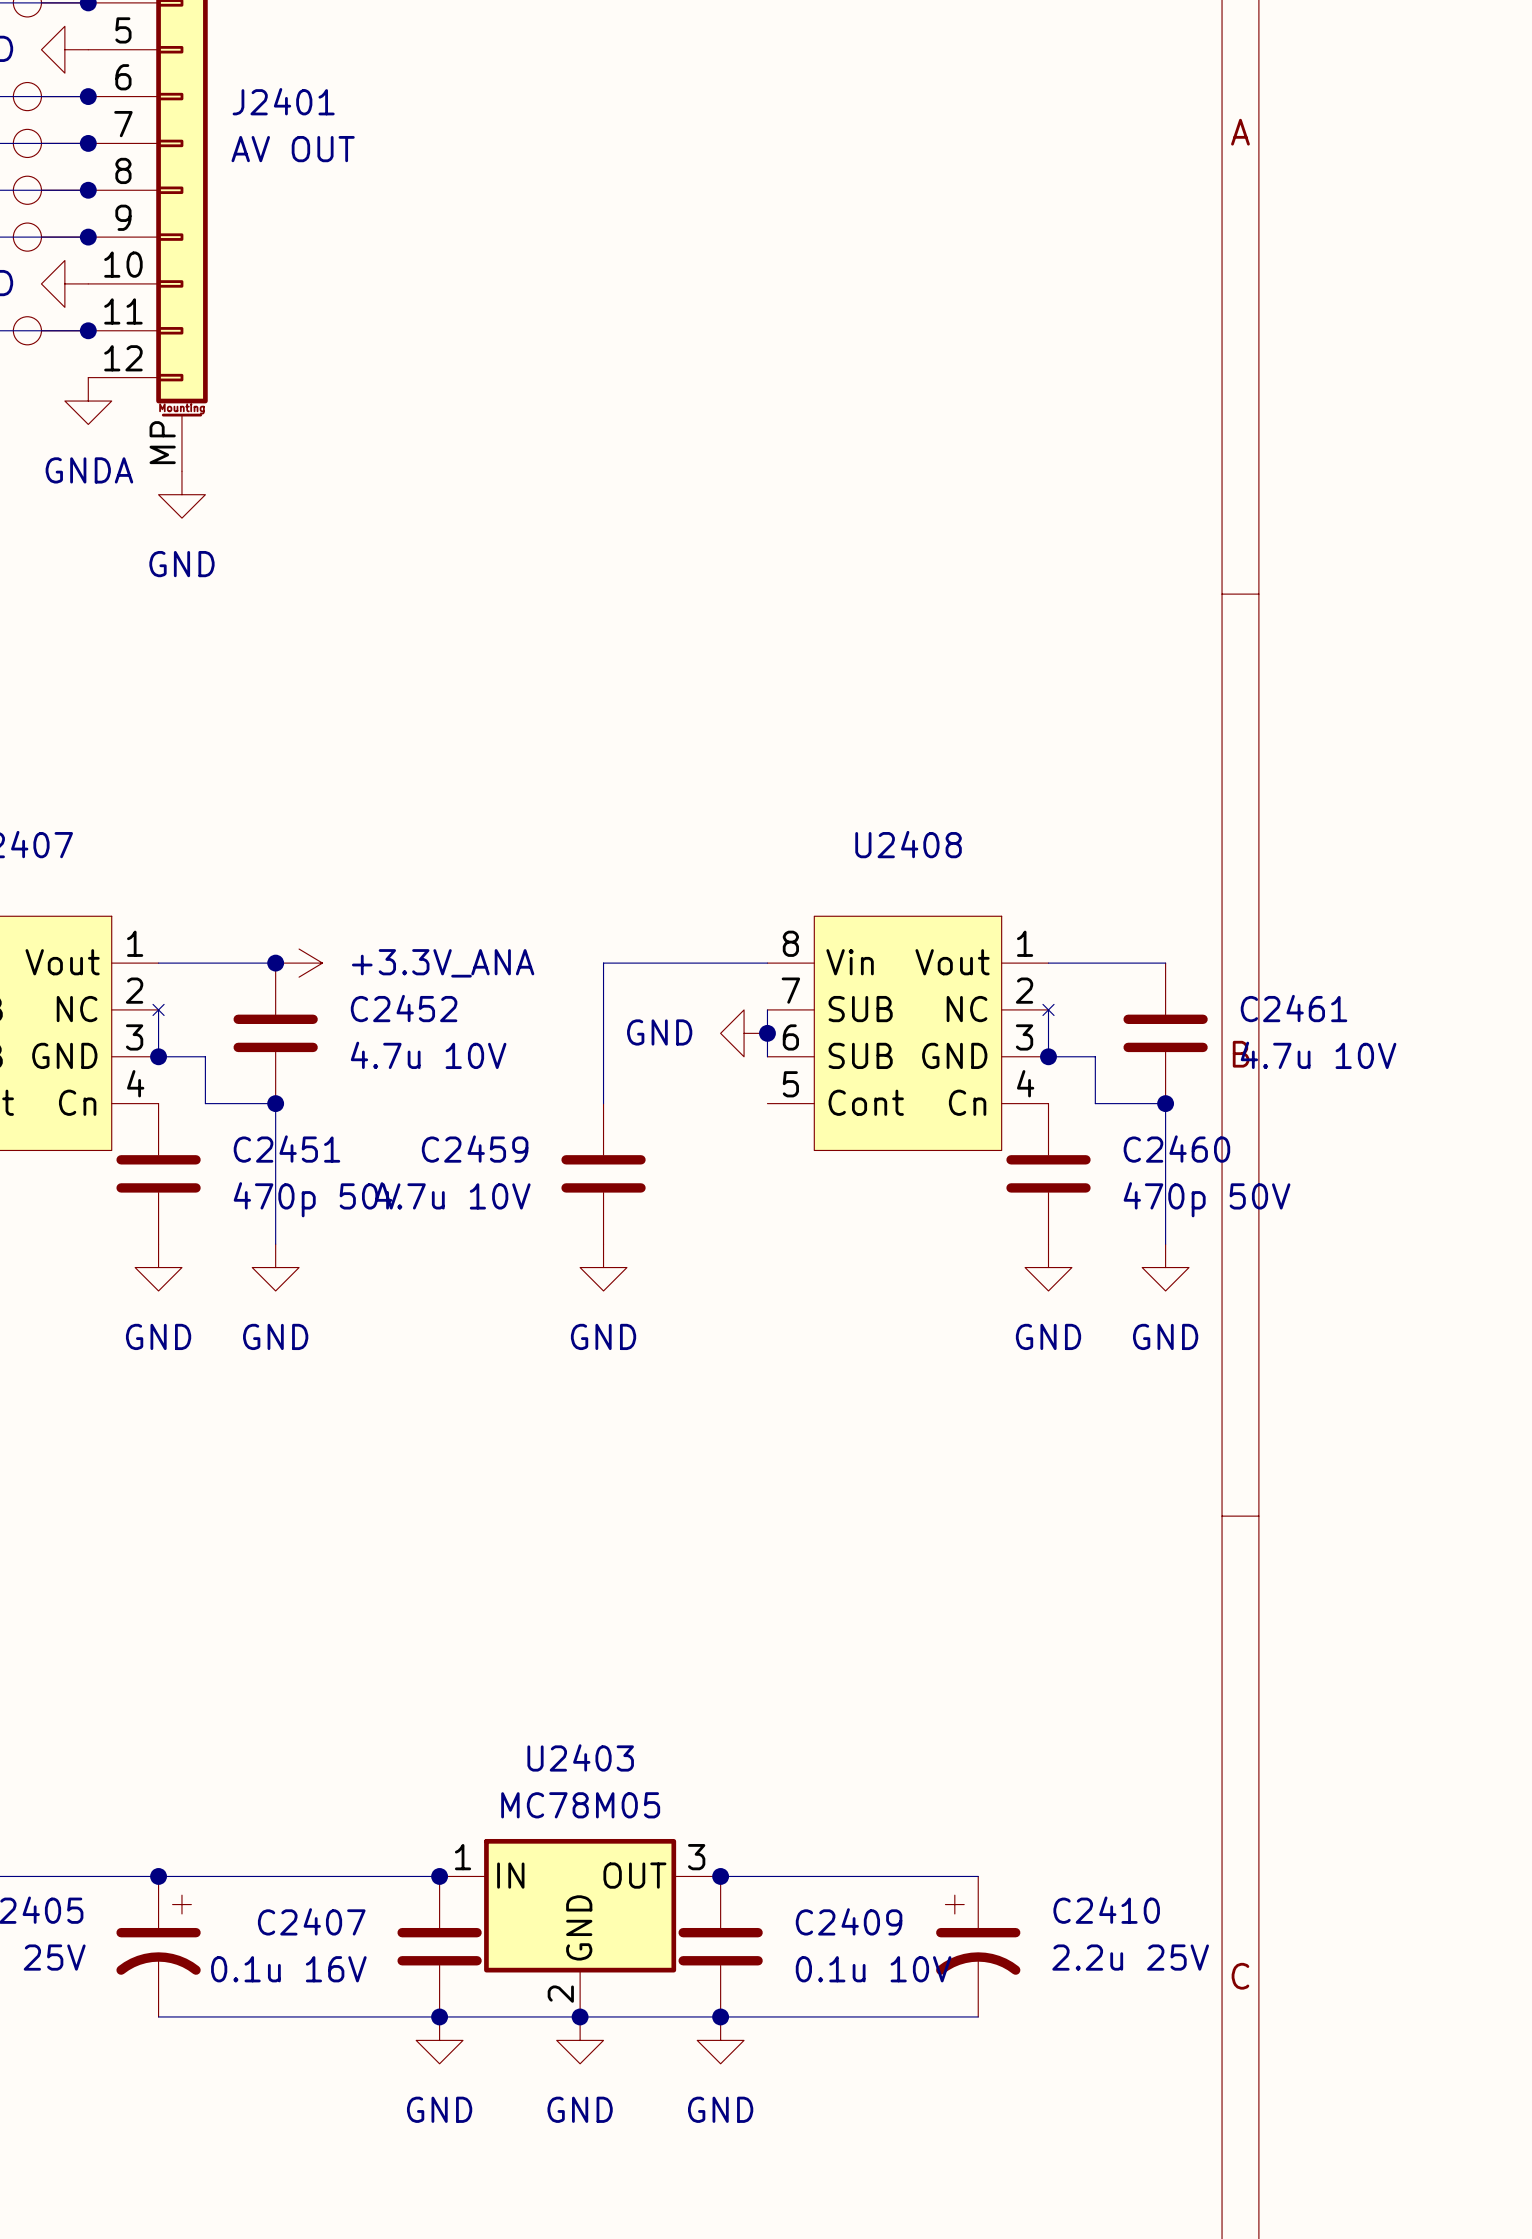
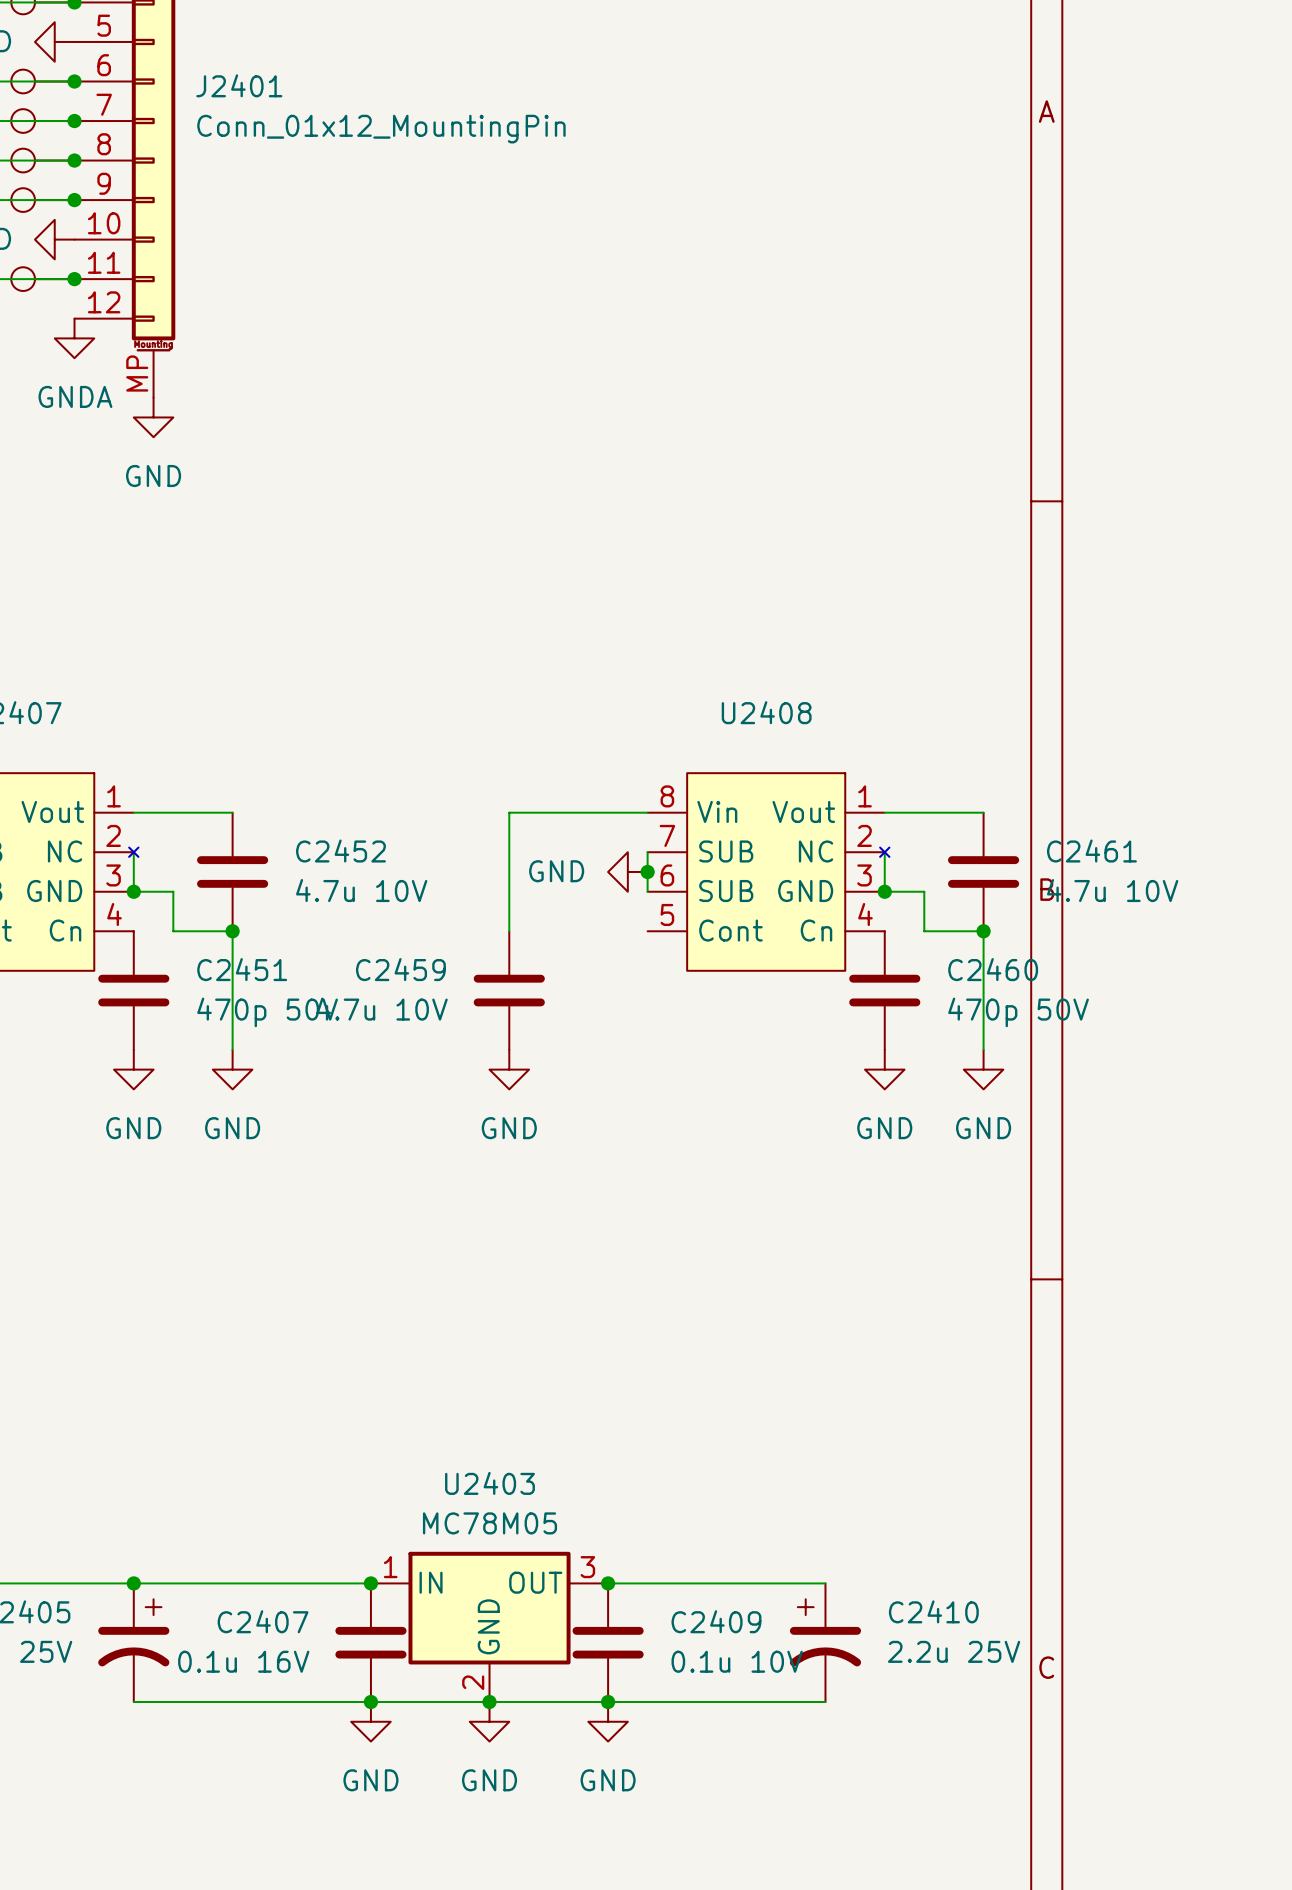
J2401 value: AV OUT (293, 149) -> Conn_01x12_MountingPin (381, 129)
junction: (275, 963) -> none
power symbol: +3.3V_ANA (299, 963) -> none

